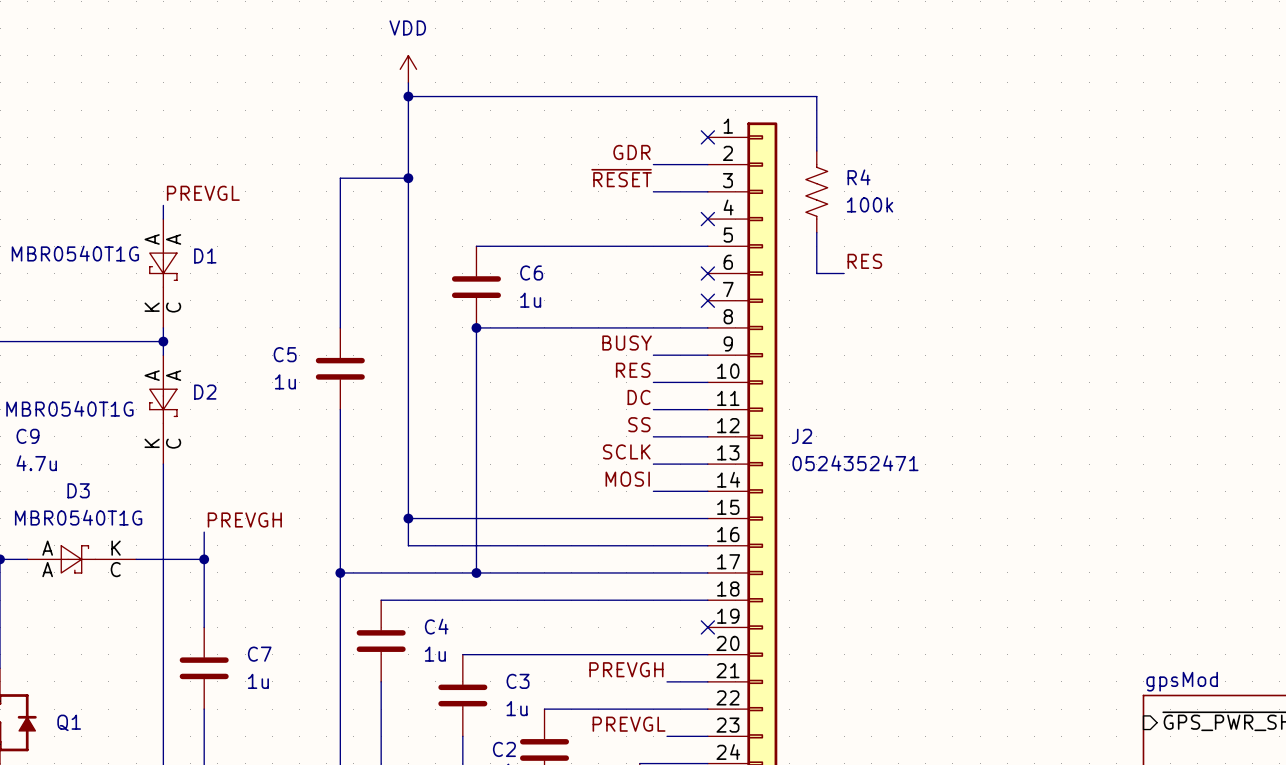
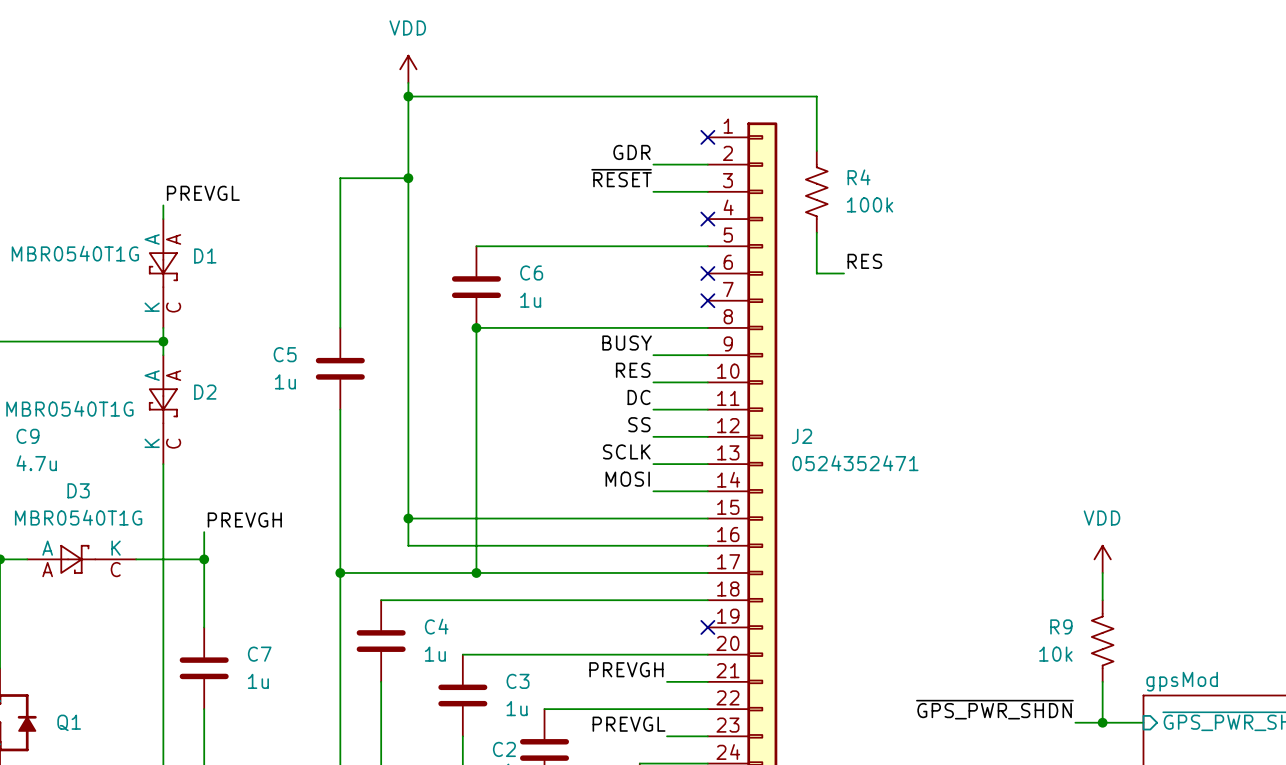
power symbol: none -> VDD (1102, 559)
wire: none -> (1102, 572) (1102, 600)
R9: none -> 10k (1102, 641)
wire: none -> (1102, 681) (1102, 722)
label: none -> ~{GPS_PWR_SHDN} (994, 709)
wire: none -> (1075, 722) (1143, 722)
junction: none -> (1102, 722)

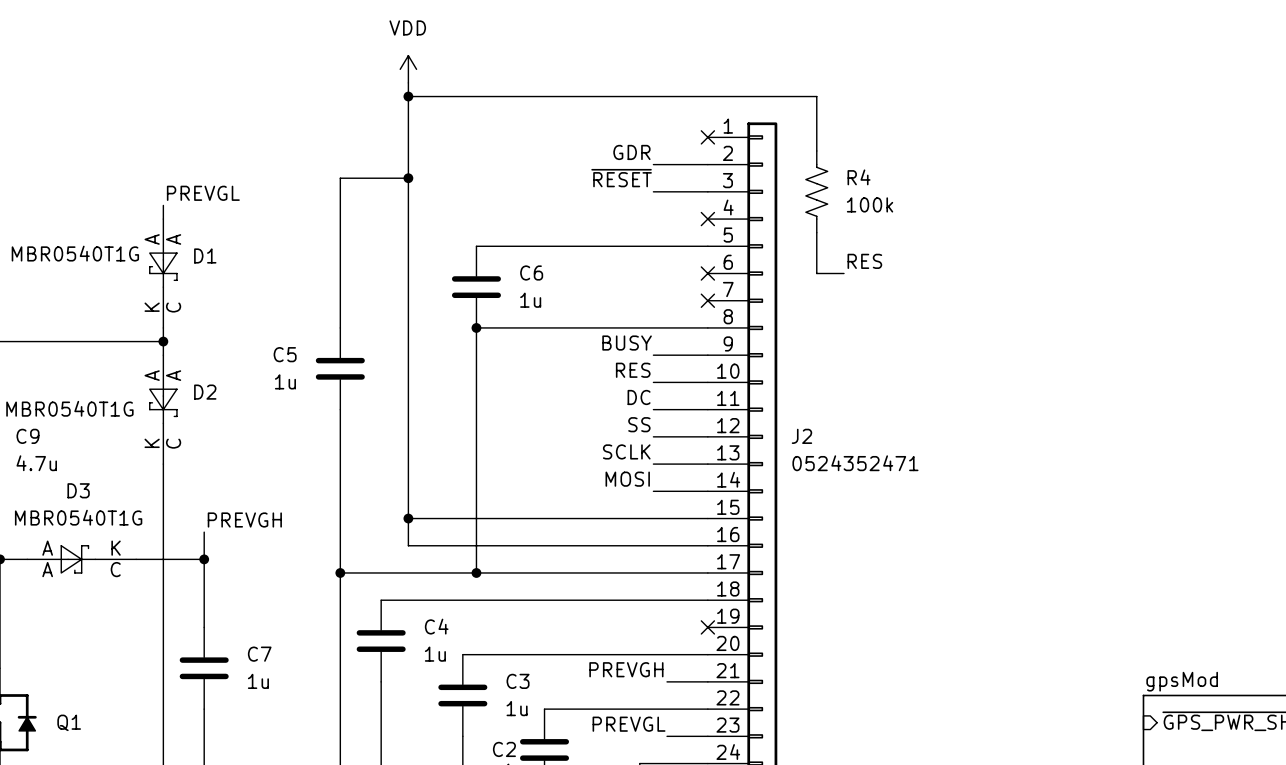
power symbol: VDD (1102, 559) -> none
wire: (1102, 572) (1102, 600) -> none
R9: 10k (1102, 641) -> none
wire: (1102, 681) (1102, 722) -> none
label: ~{GPS_PWR_SHDN} (994, 709) -> none
wire: (1075, 722) (1143, 722) -> none
junction: (1102, 722) -> none

